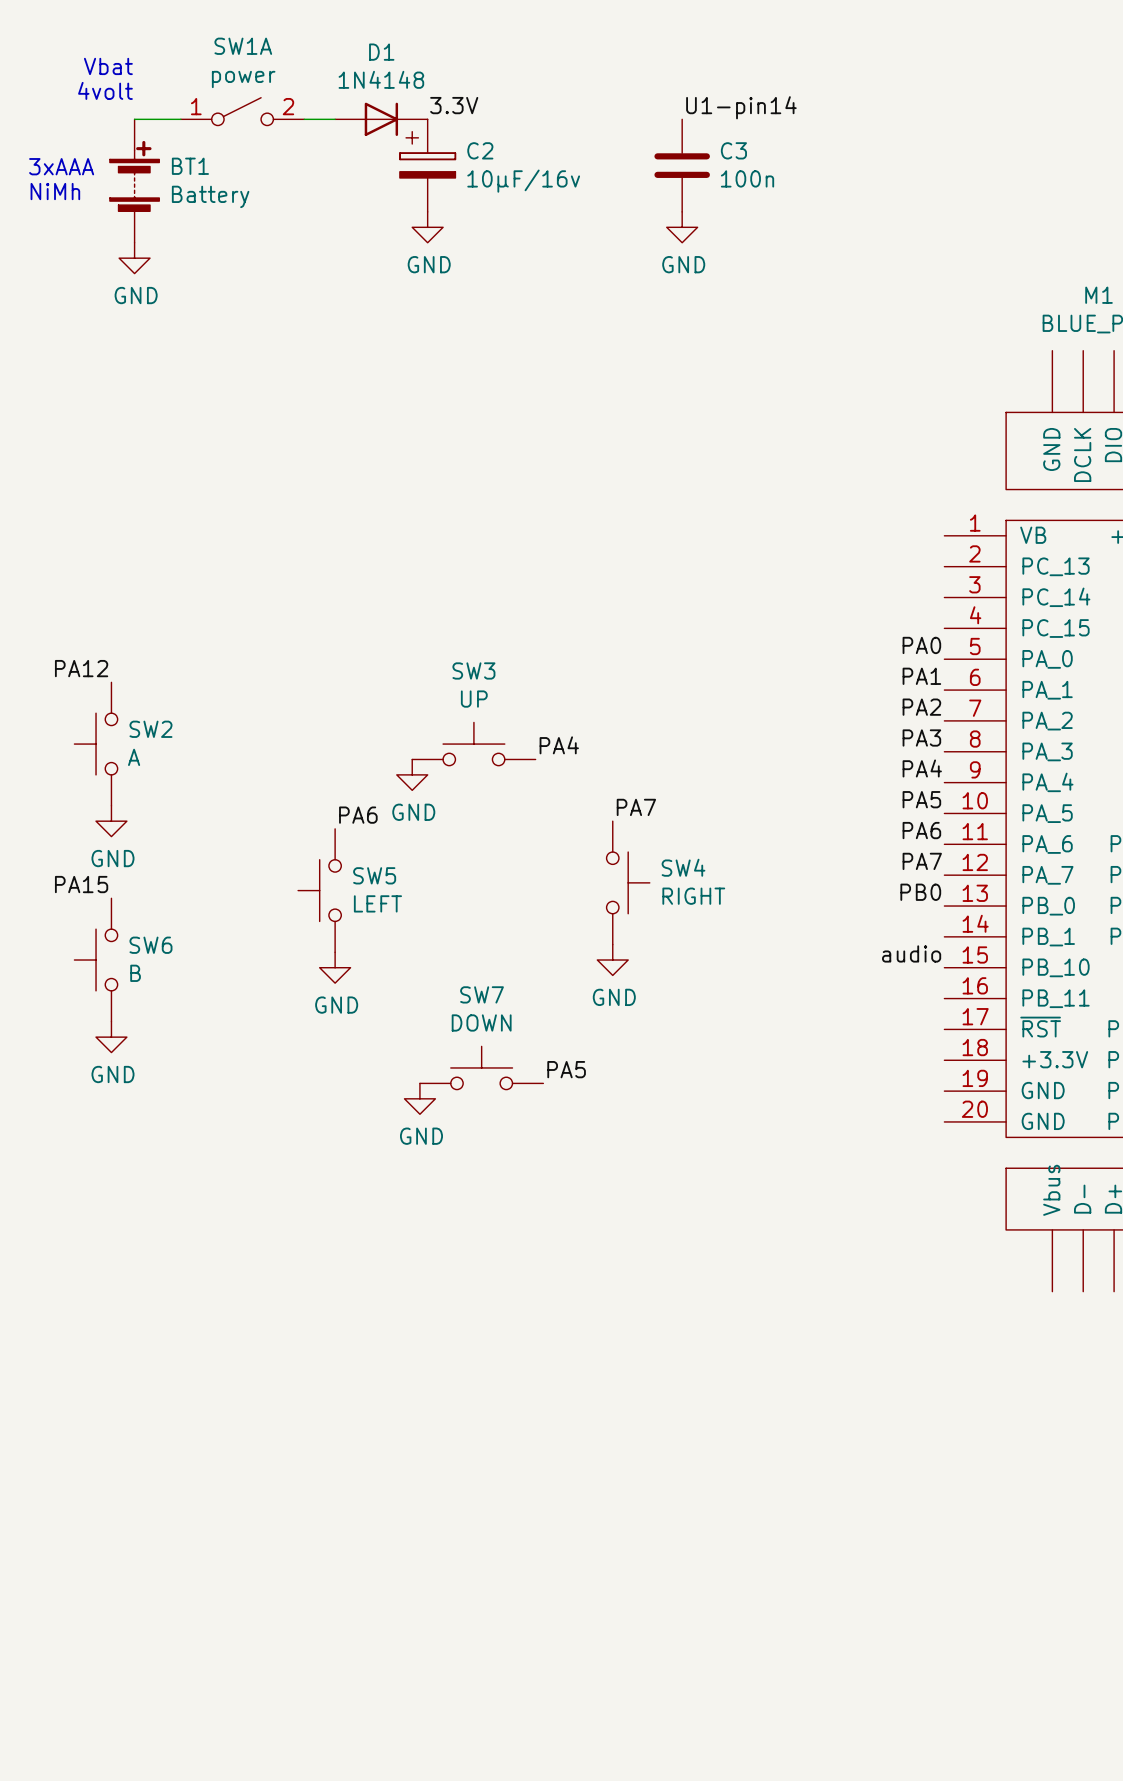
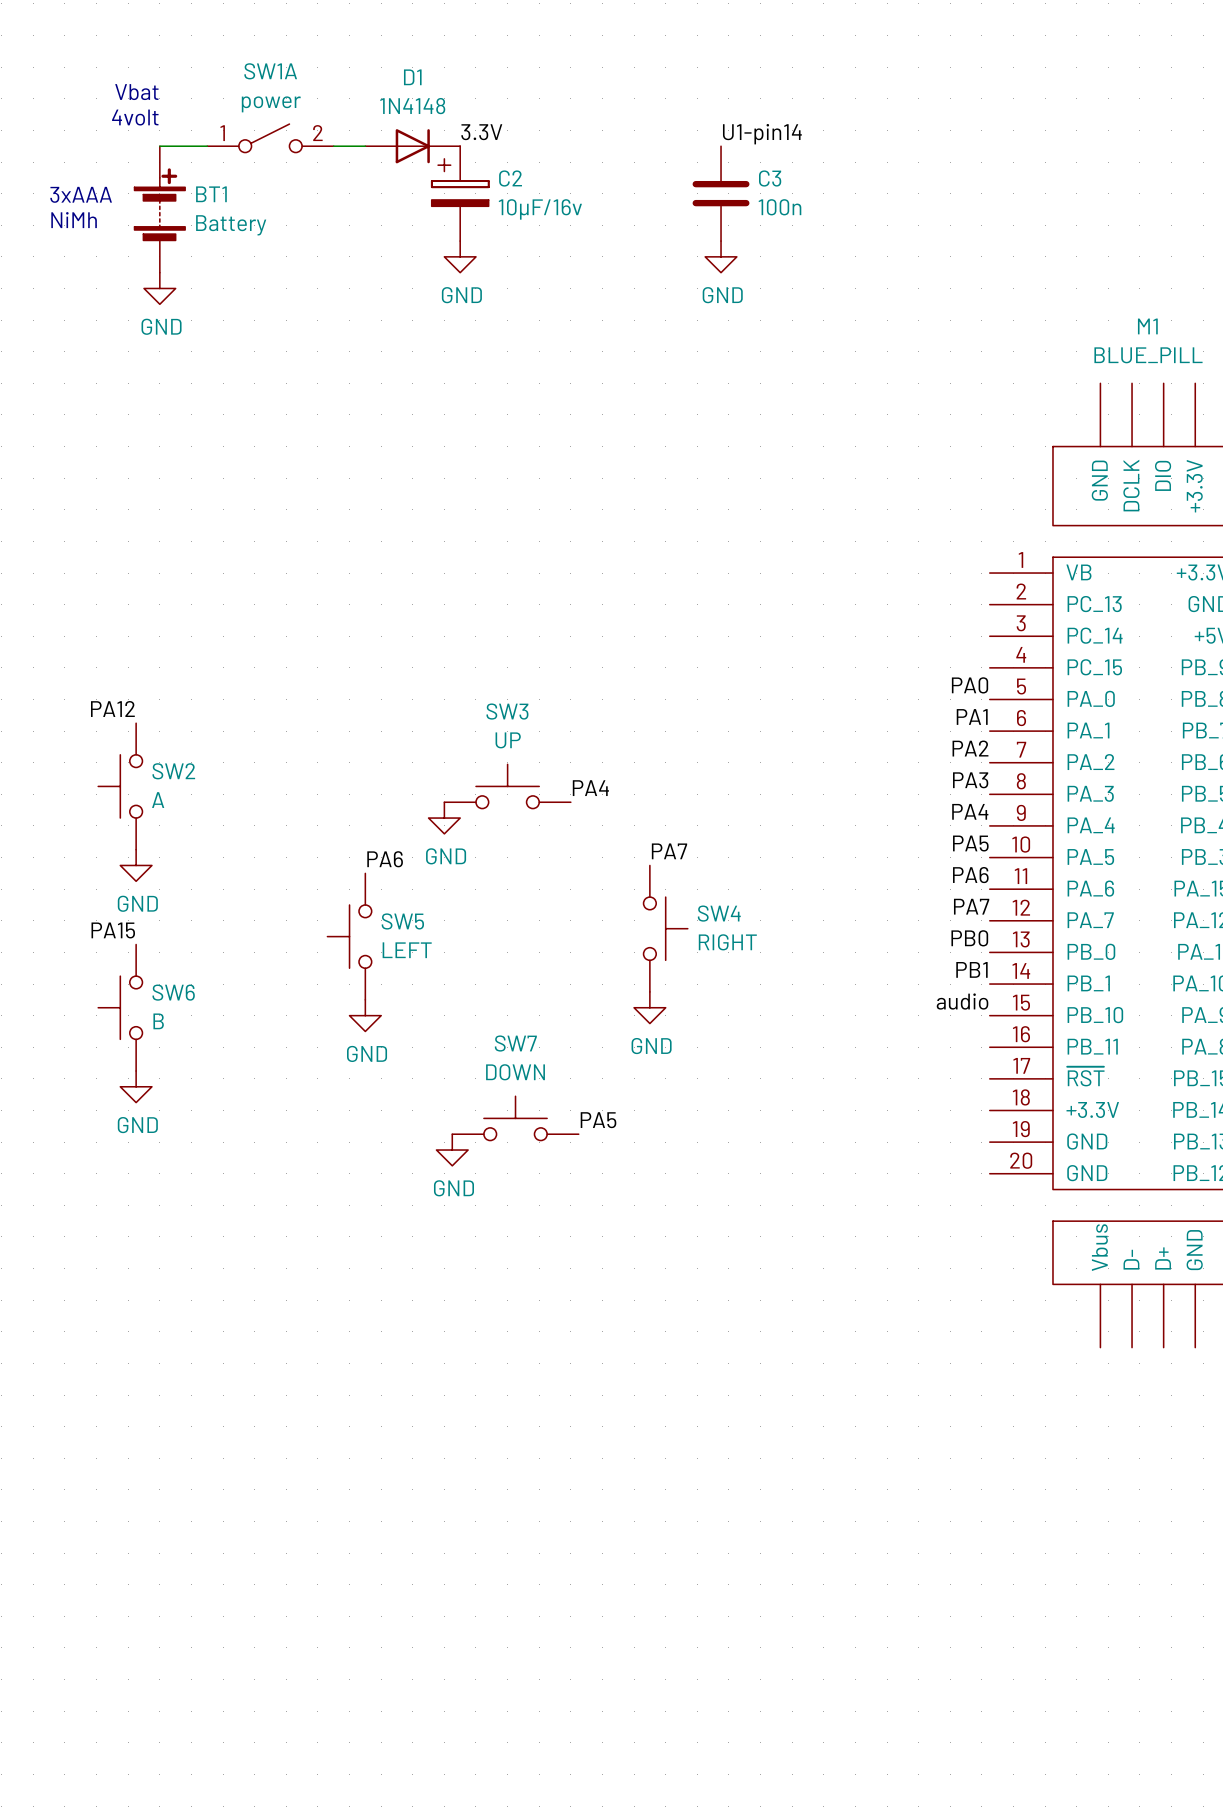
label: none -> PB1 (971, 969)

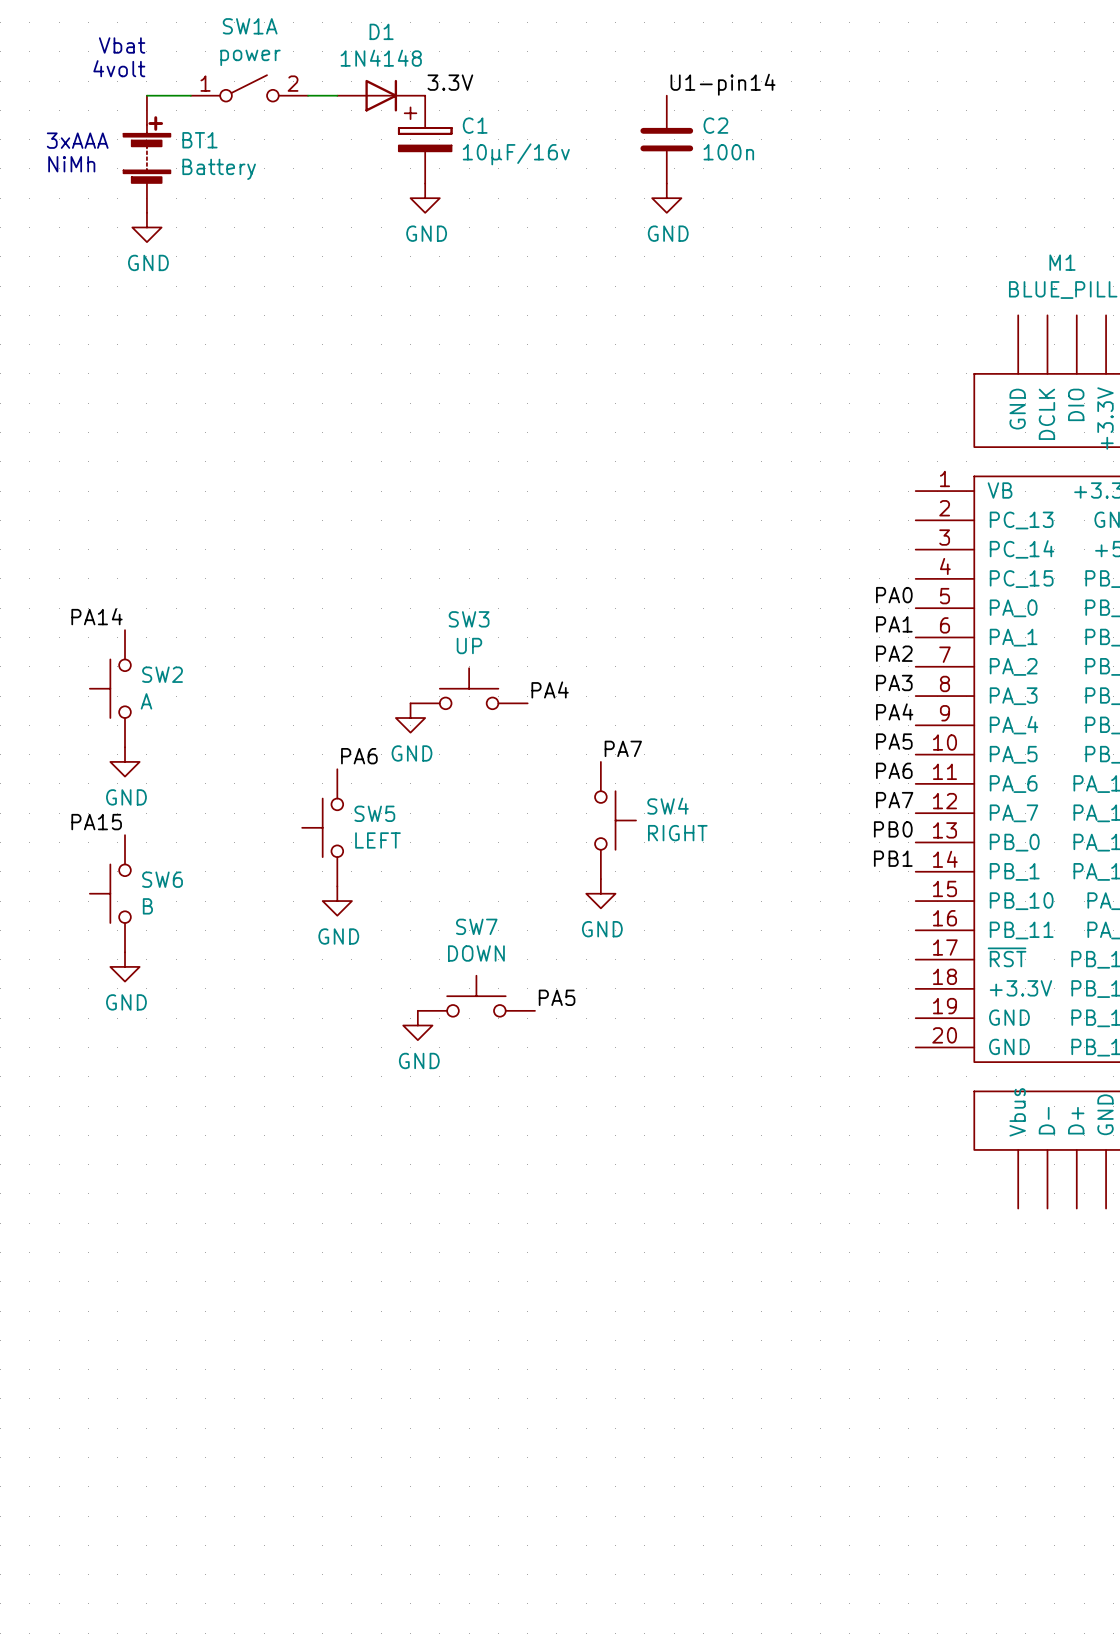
C2 name: C2 (510, 178) -> C1 (475, 125)
C3 name: C3 (770, 178) -> C2 (715, 125)
label: PA12 (112, 709) -> PA14 (97, 616)
label: audio (962, 1001) -> none

